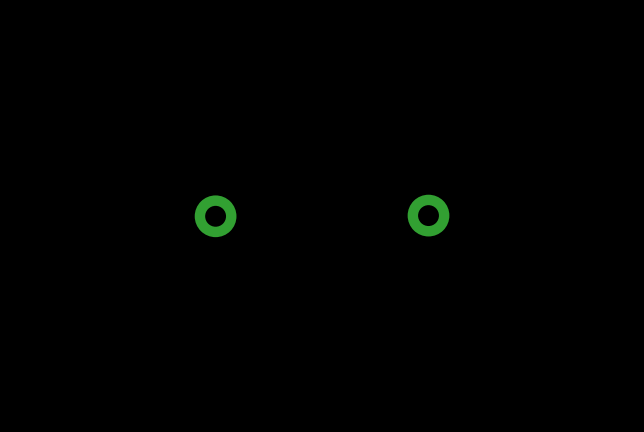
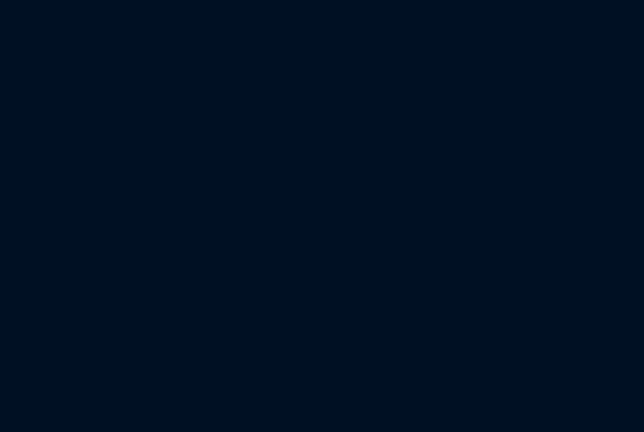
via: (428, 215) -> none
via: (215, 216) -> none

